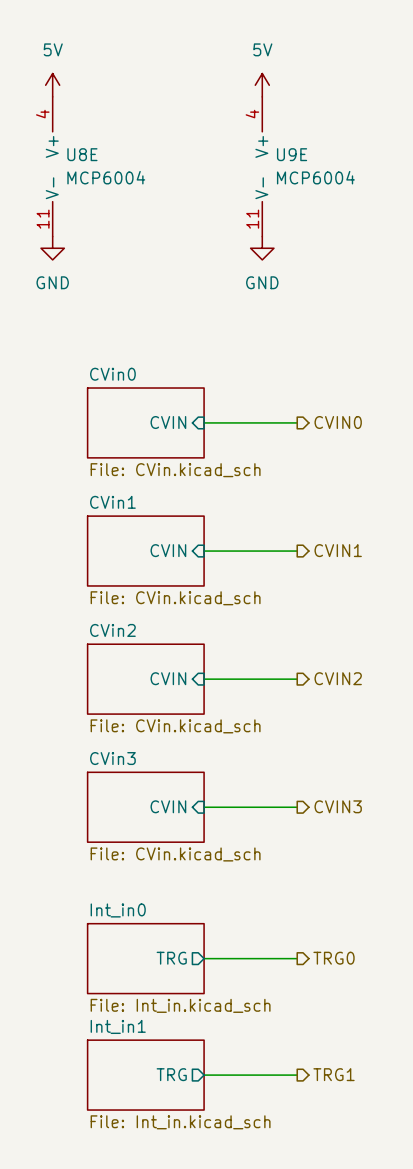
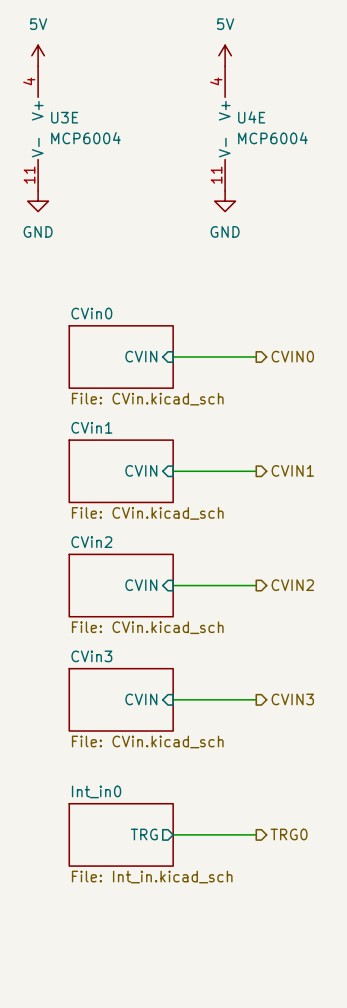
U8E name: U8E (82, 154) -> U3E (64, 117)
U9E name: U9E (292, 154) -> U4E (251, 117)
sheet pin: TRG (171, 1074) -> none
hierarchical label: TRG1 (334, 1074) -> none
sheet Int_in1: File: Int_in.kicad_sch (145, 1075) -> none
wire: (204, 1075) (297, 1075) -> none

